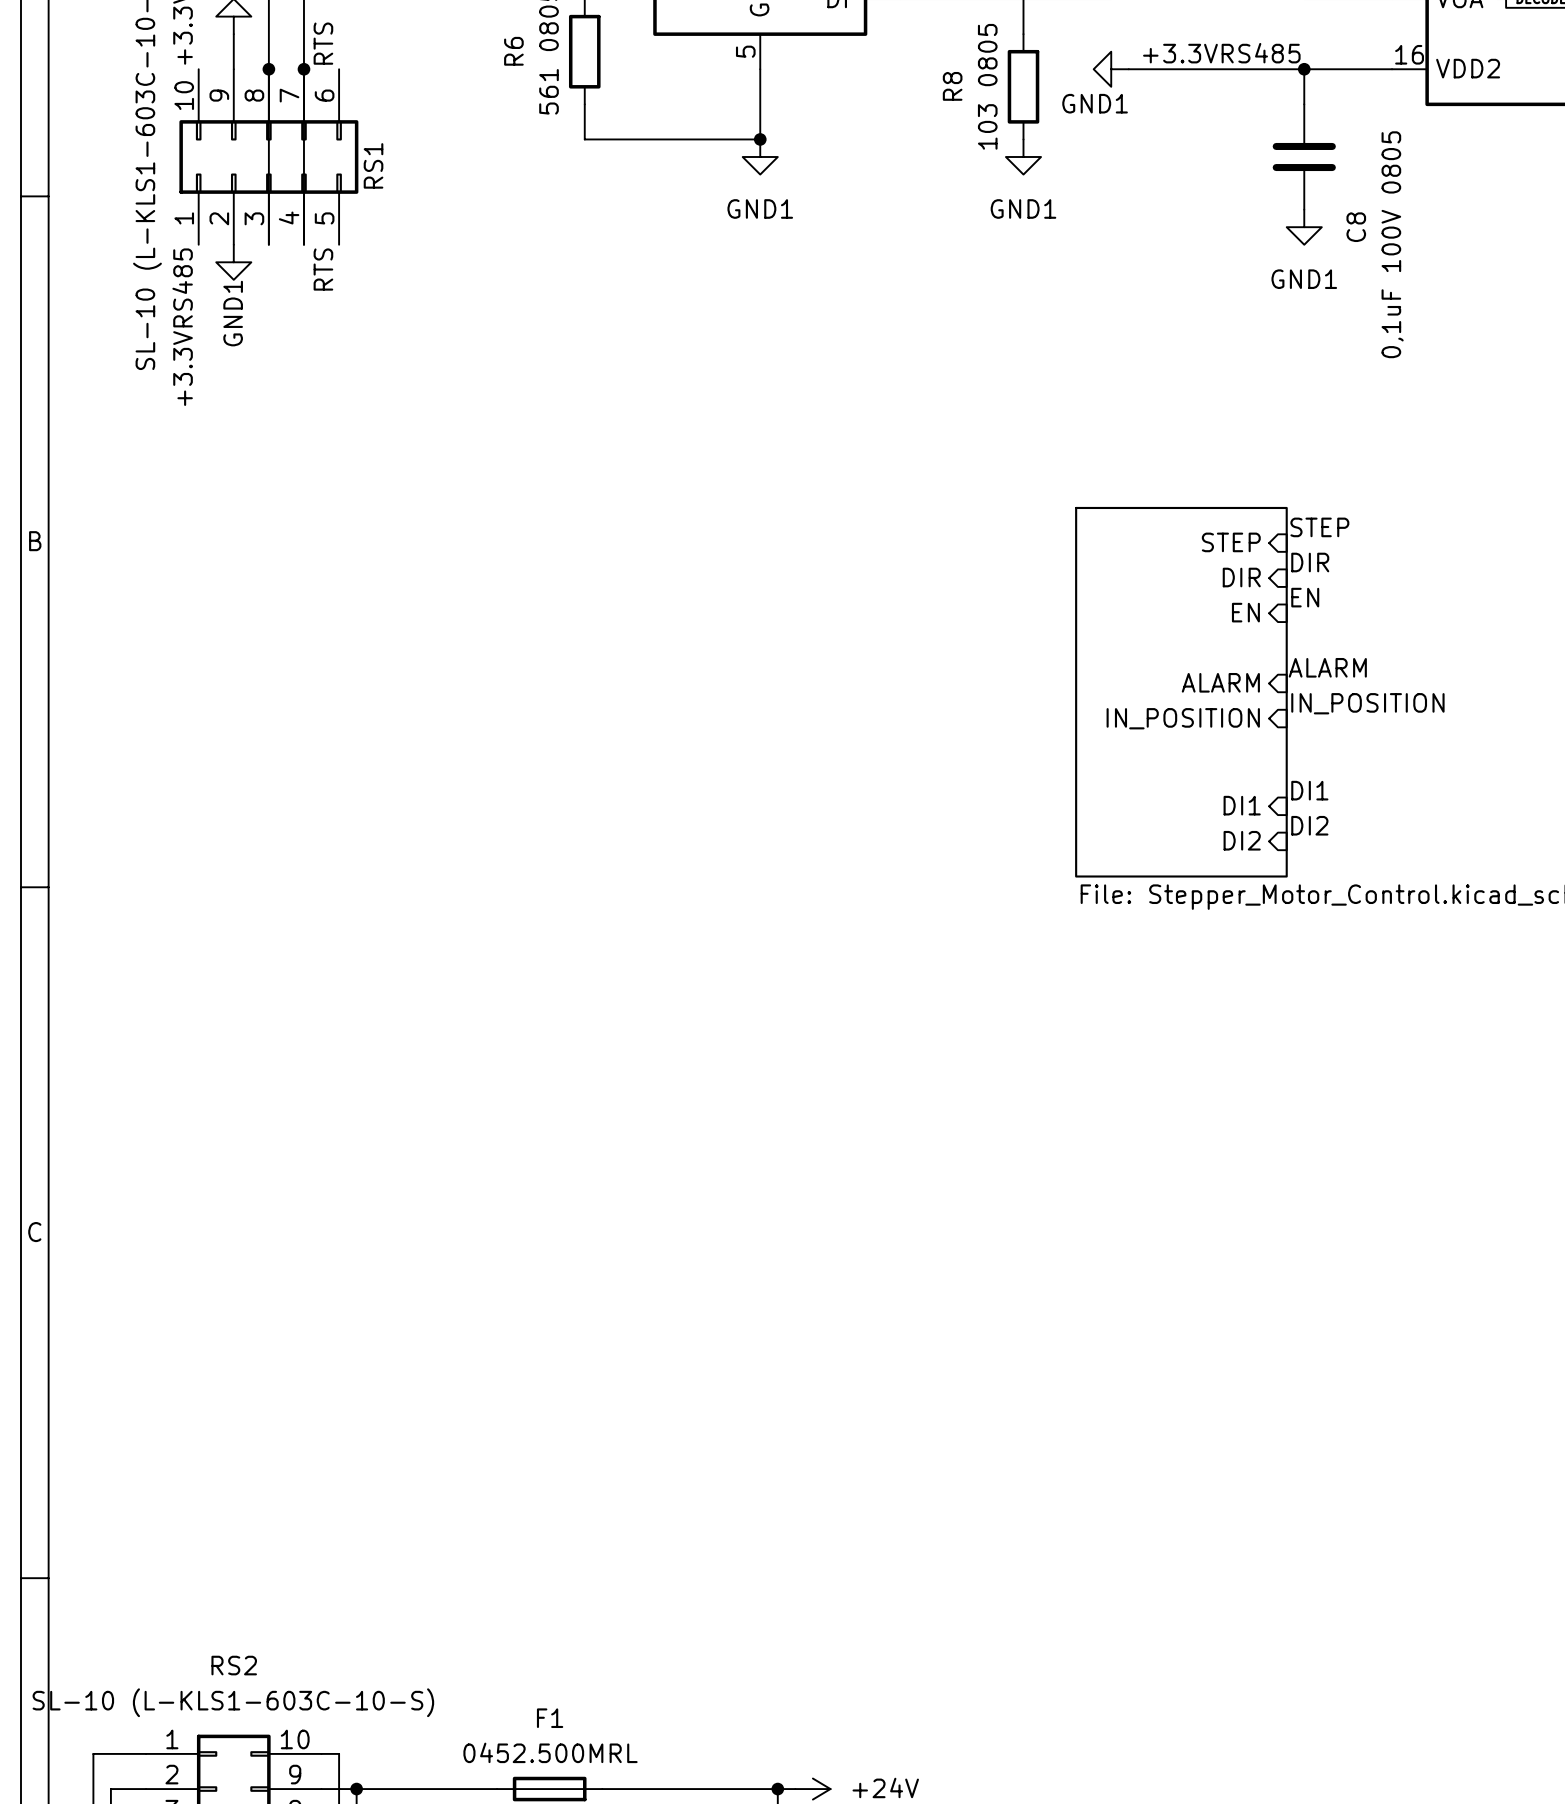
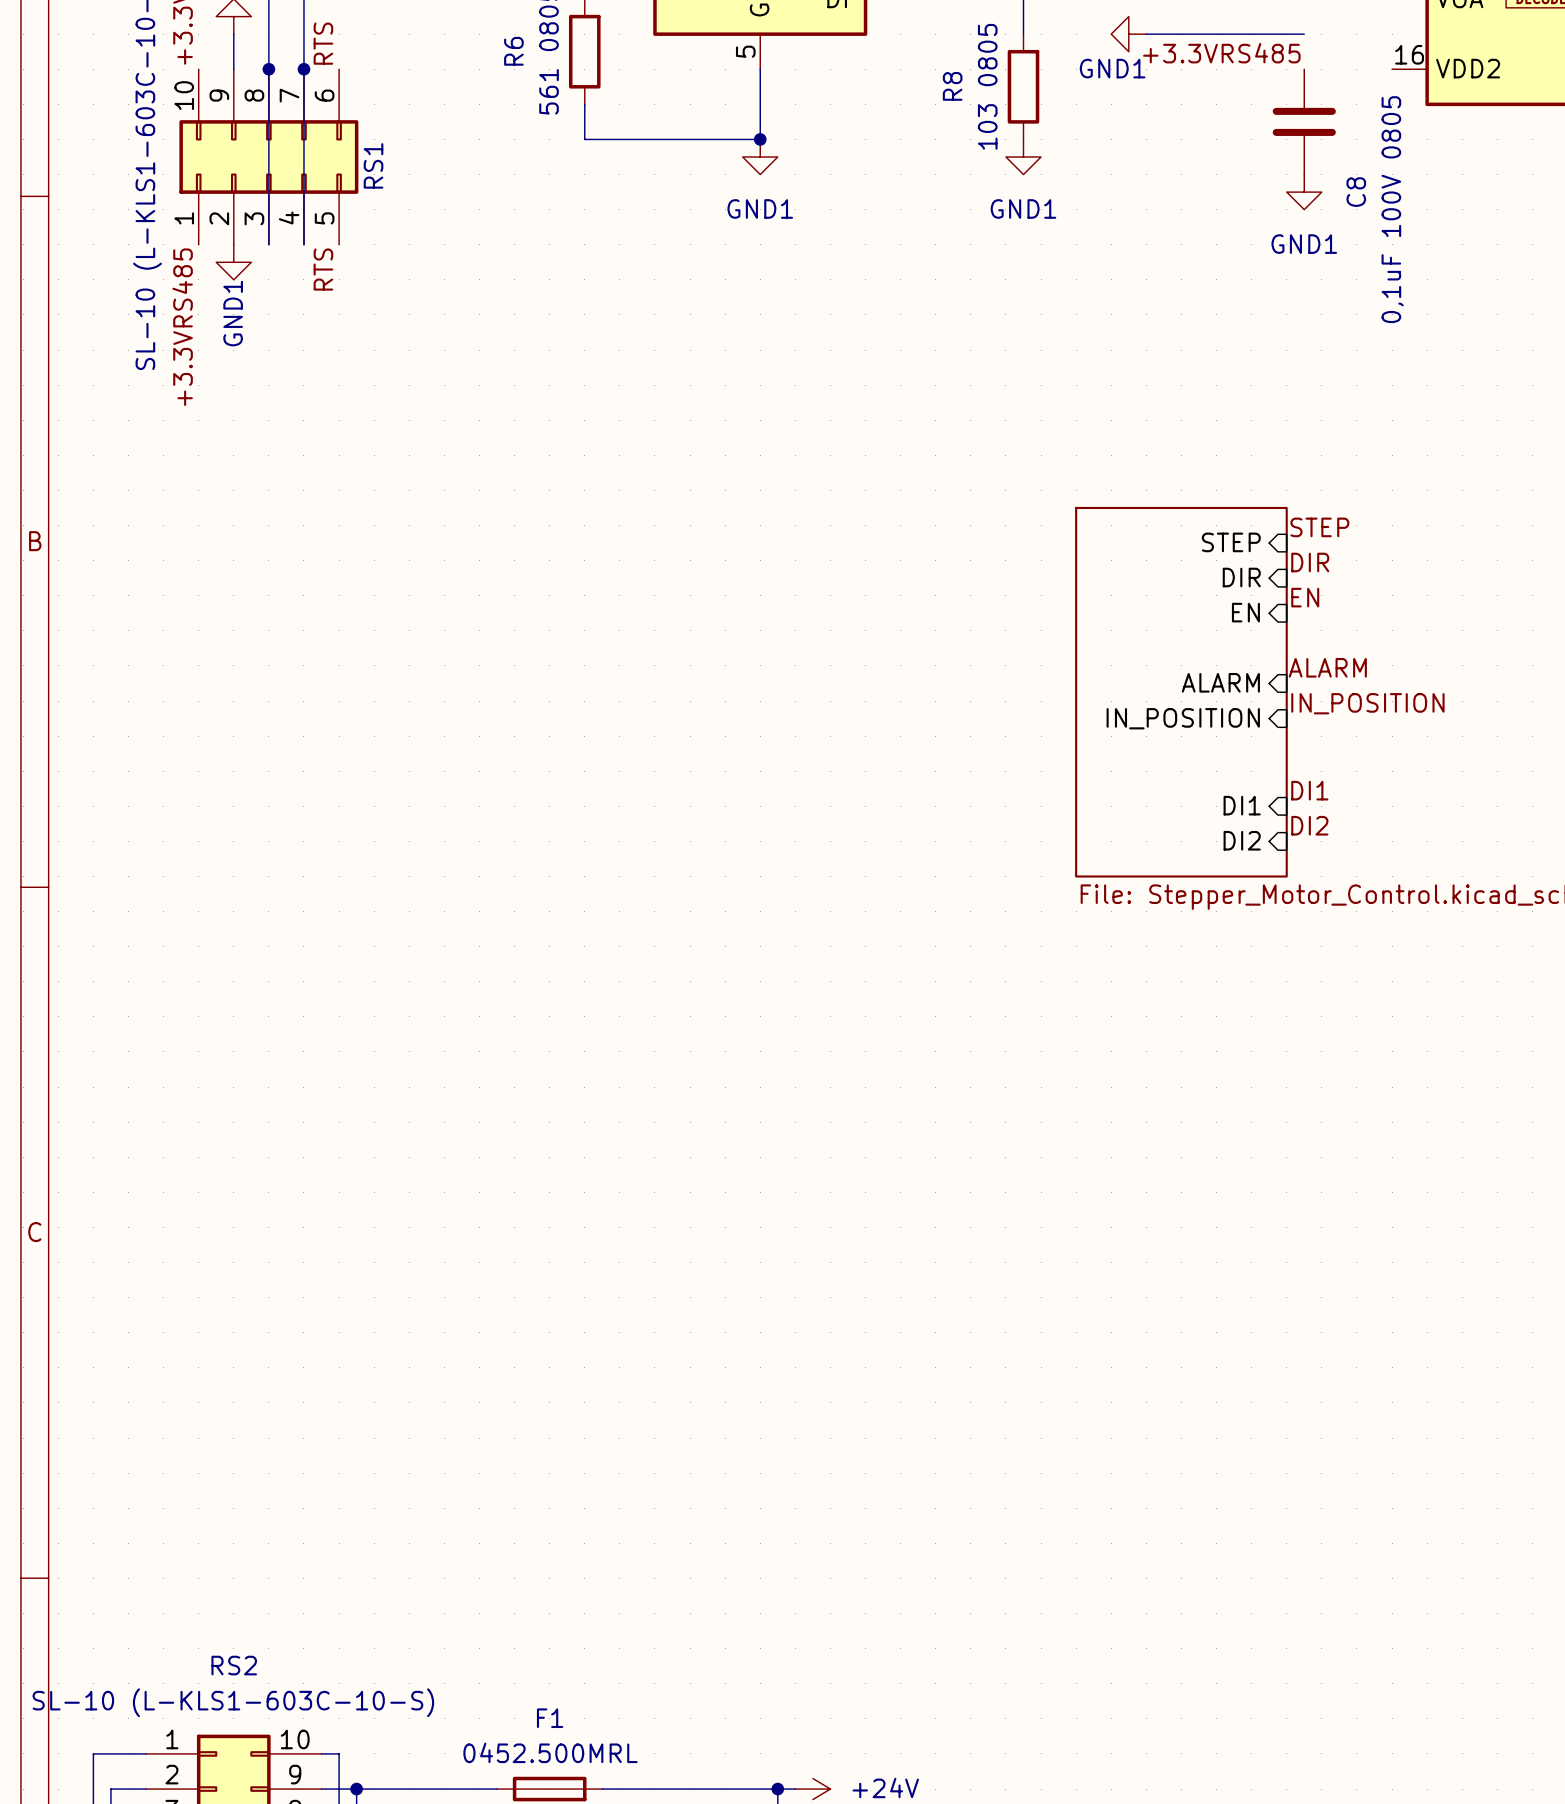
wire: none -> (1146, 34) (1304, 34)
power symbol position: GND1 (1111, 69) -> GND1 (1128, 34)
wire: (1128, 69) (1392, 69) -> none
junction: (1304, 69) -> none
C8 position: (1304, 157) -> (1304, 121)
power symbol position: GND1 (1304, 227) -> GND1 (1304, 192)

